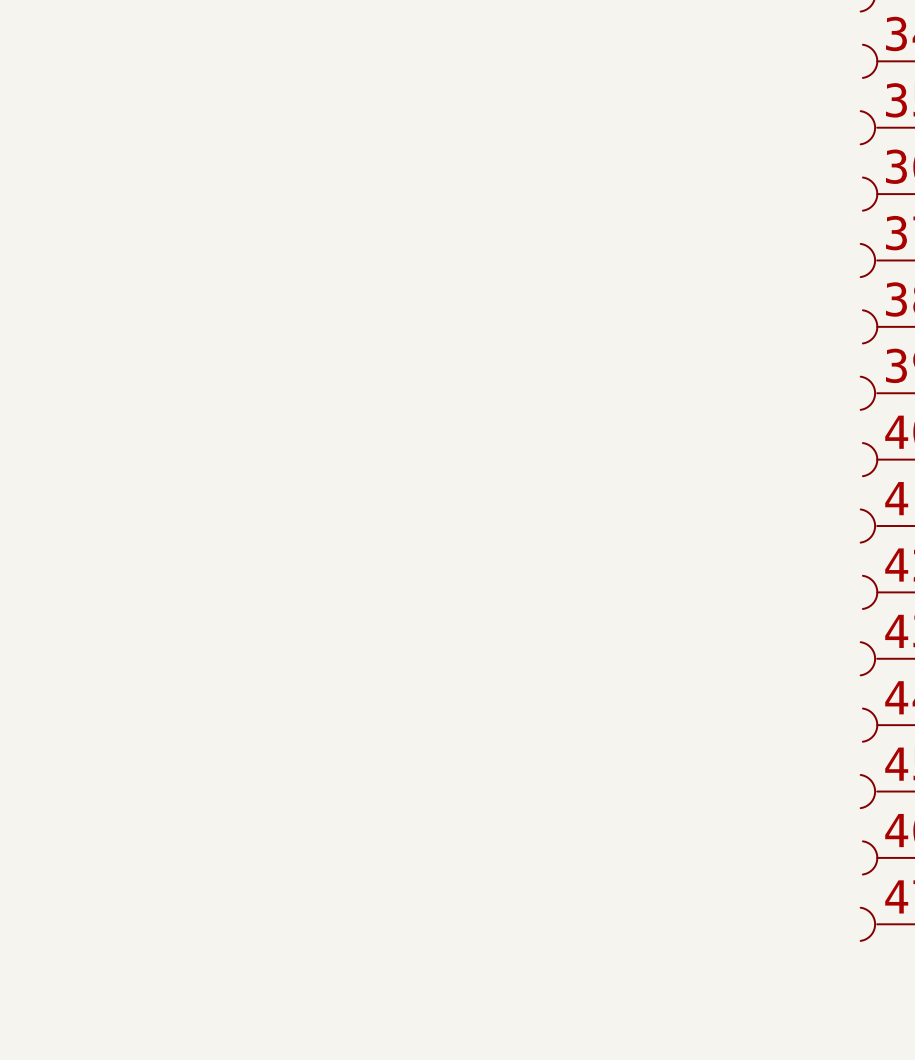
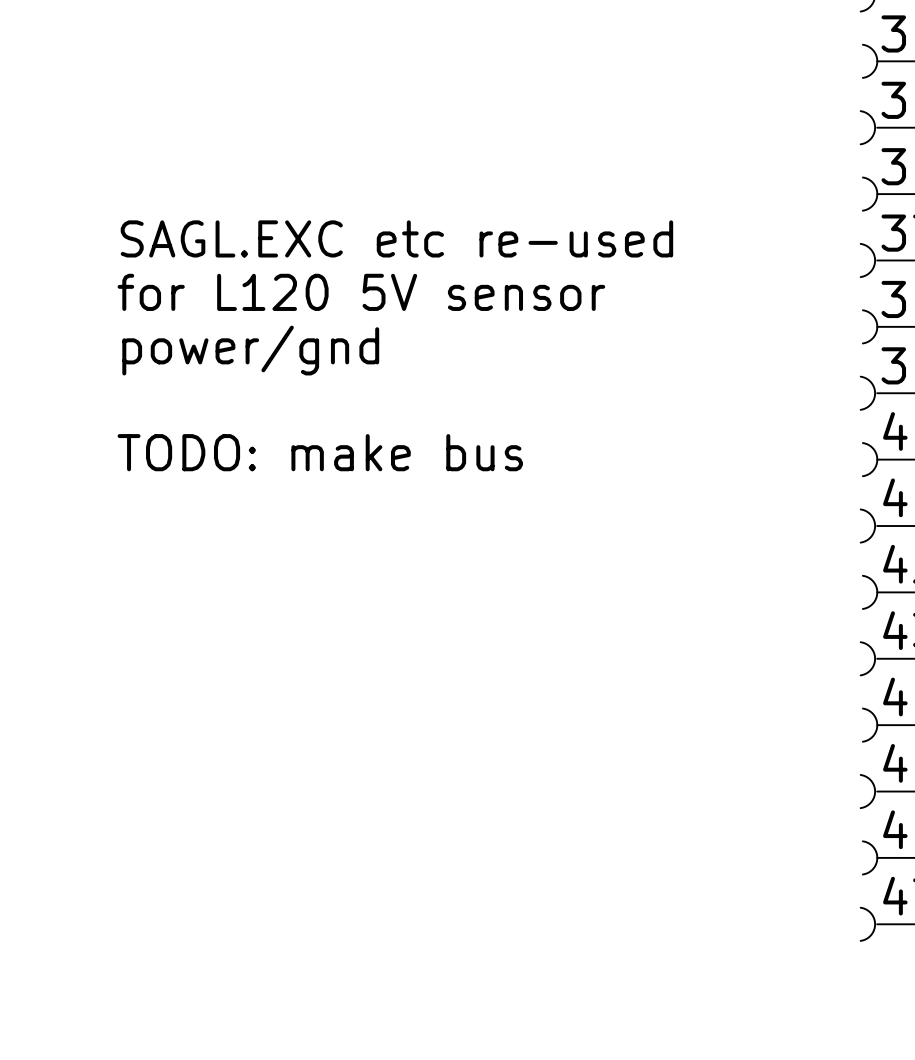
text: none -> SAGL.EXC etc re-used (396, 238)
text: none -> for L120 5V sensor (361, 292)
text: none -> power/gnd (250, 350)
text: none -> TODO: make bus (320, 452)

